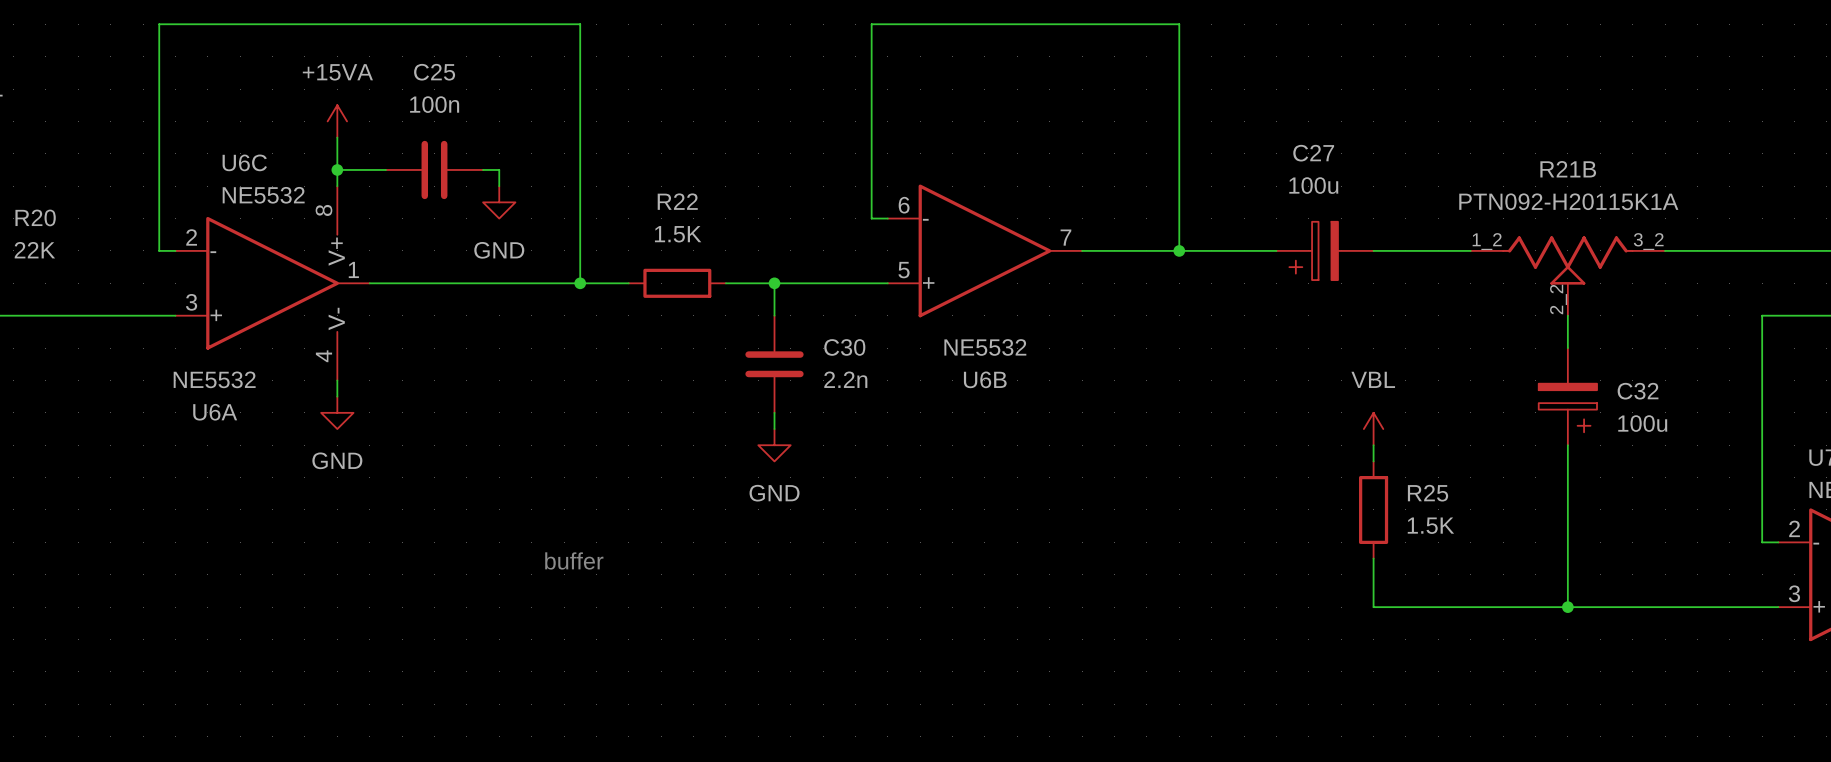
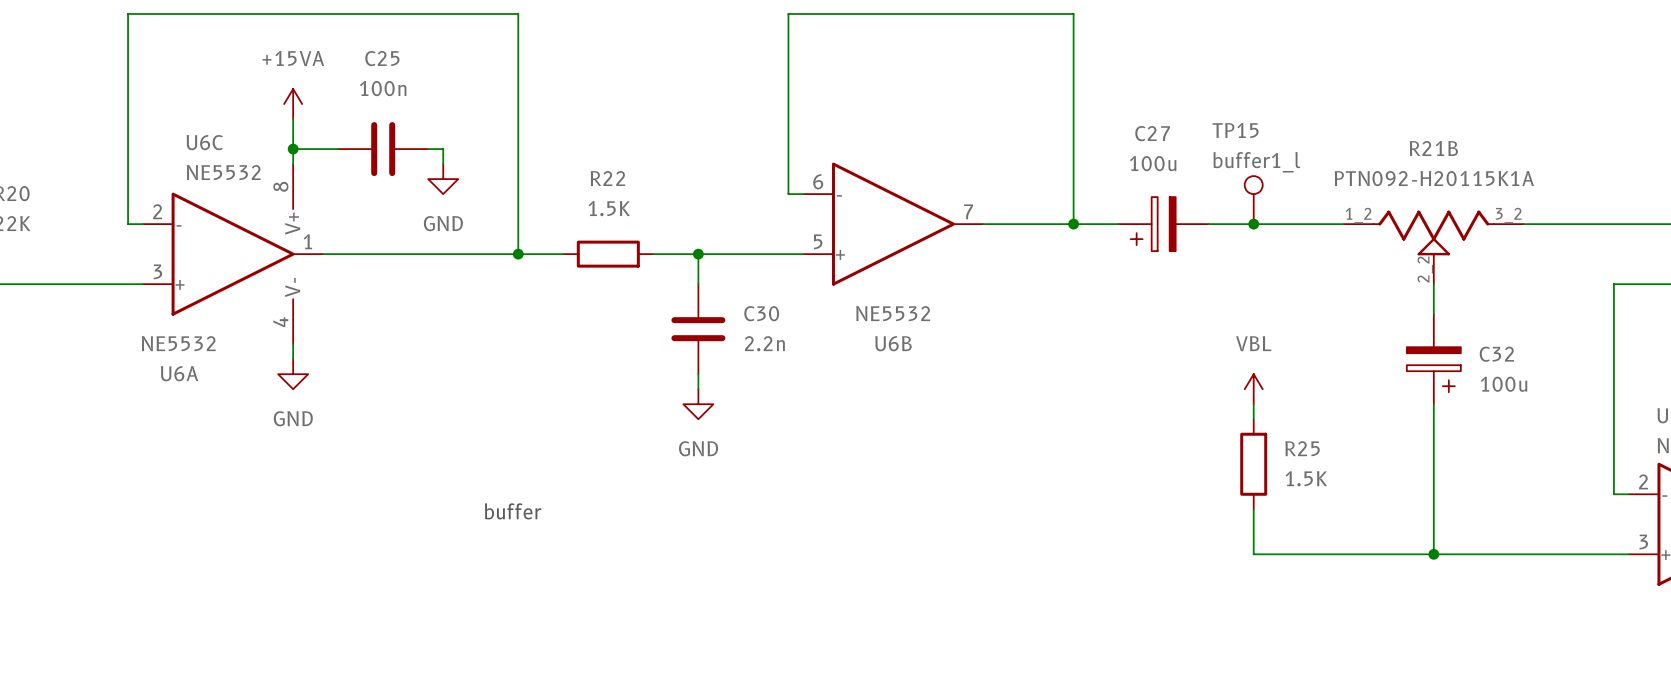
TP15: none -> buffer1_l (1253, 200)
C27 position: (1325, 250) -> (1163, 224)
junction: none -> (1253, 224)

